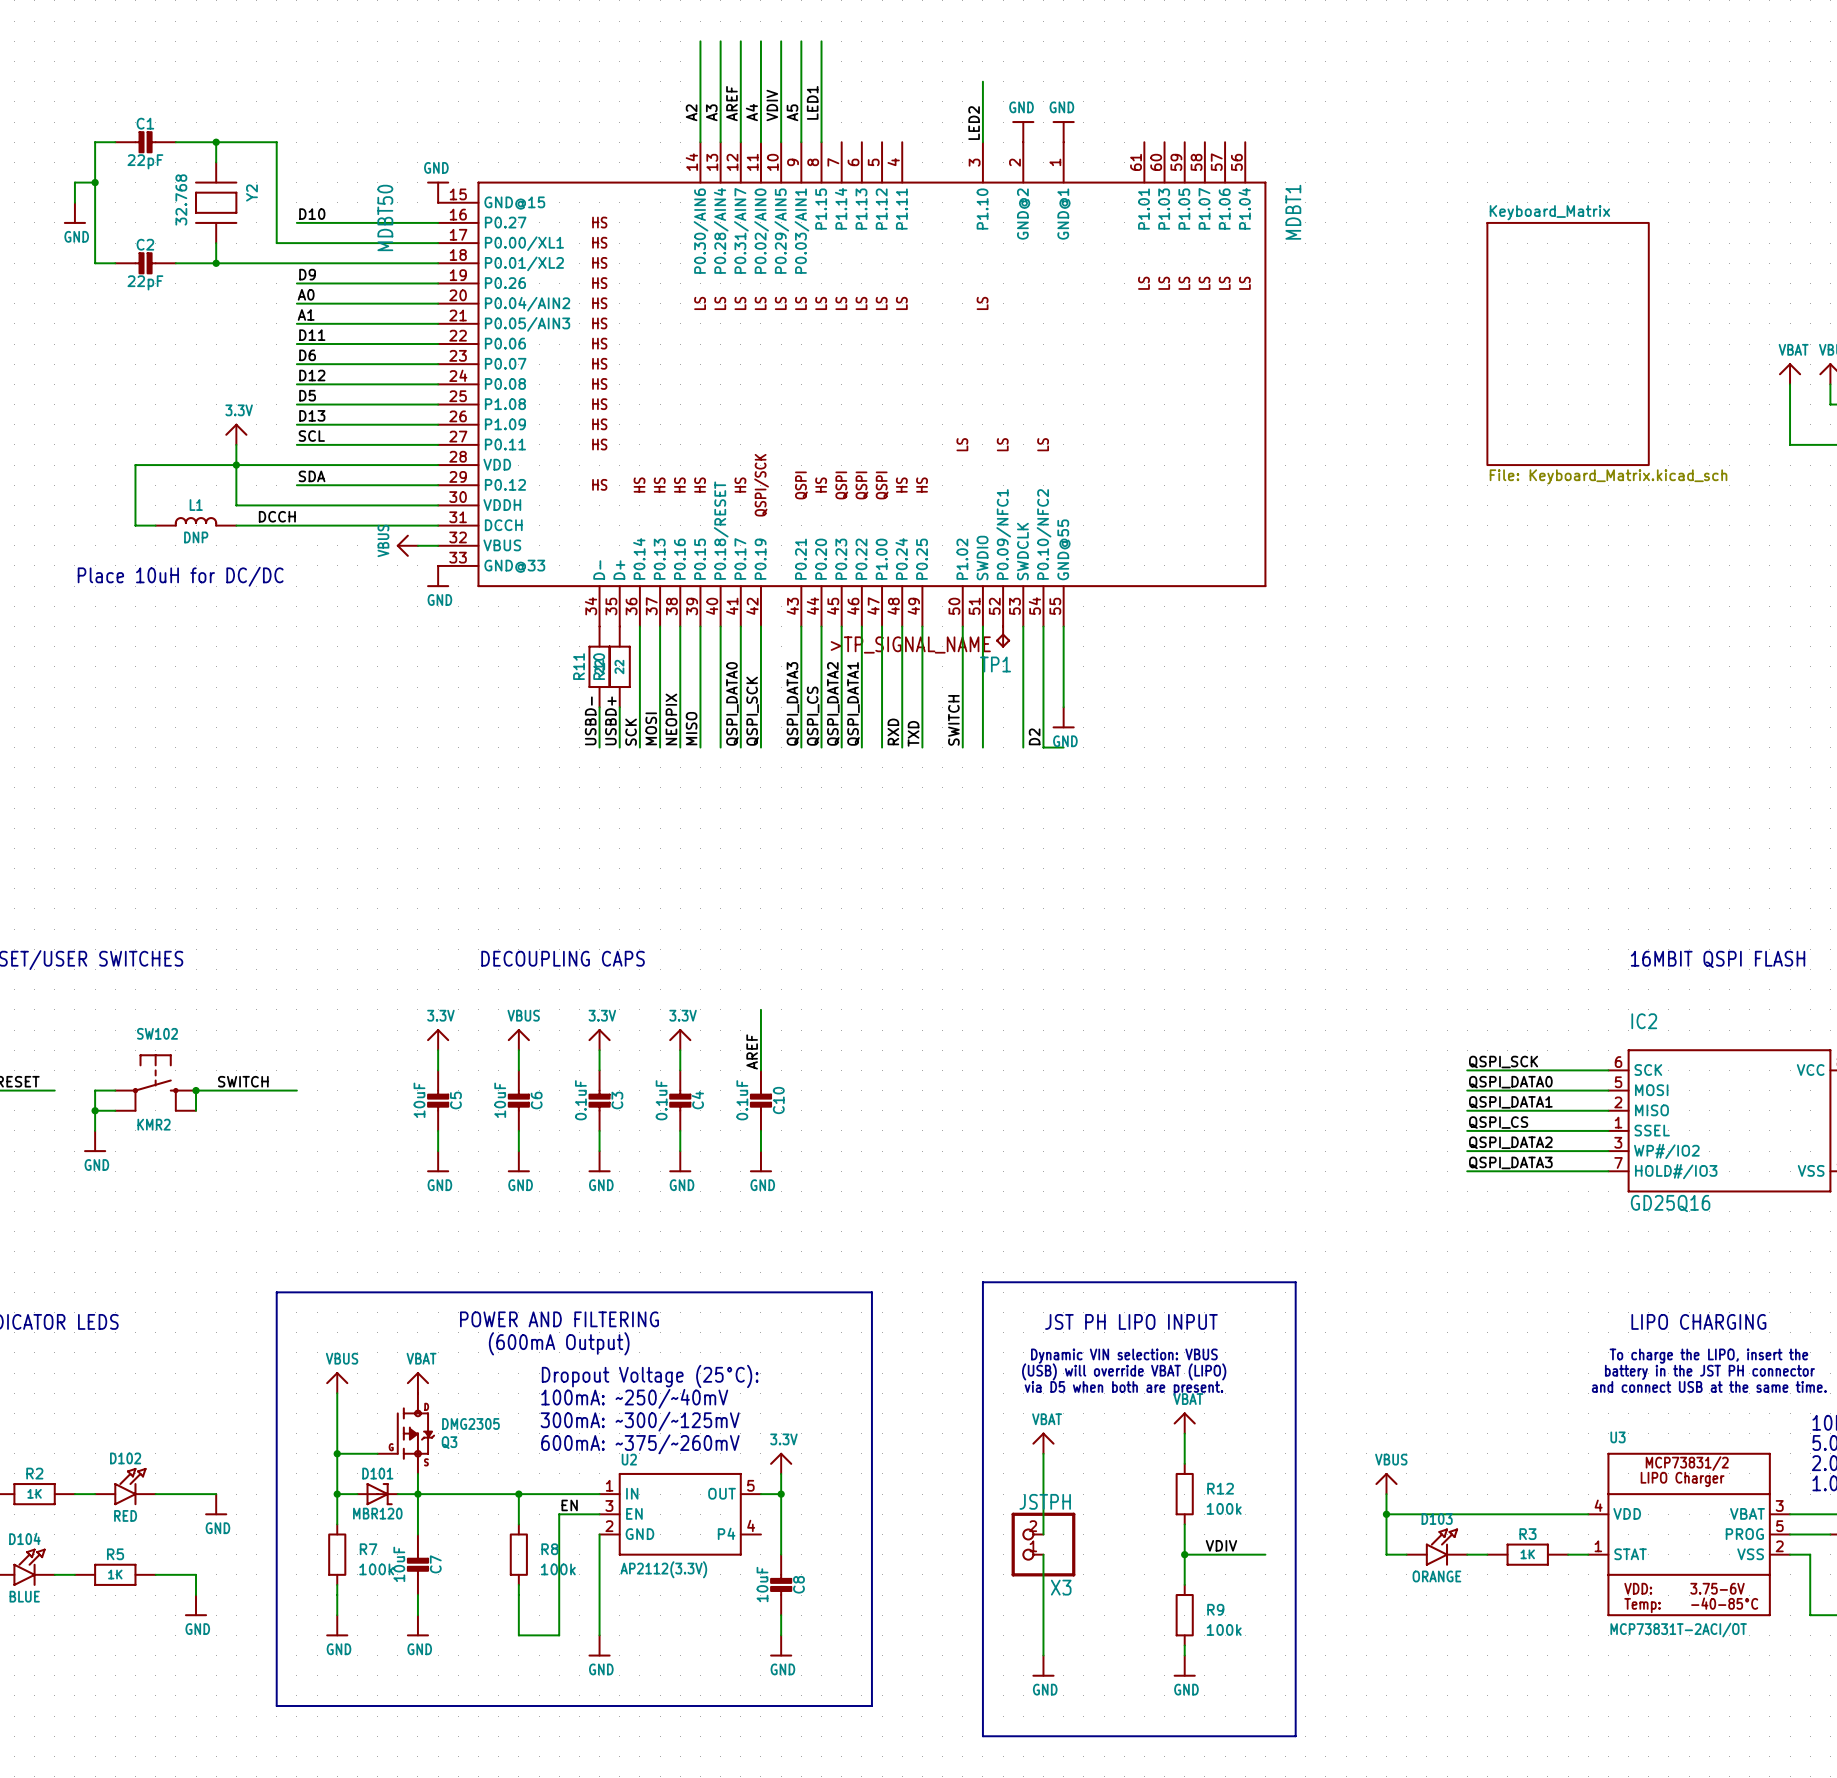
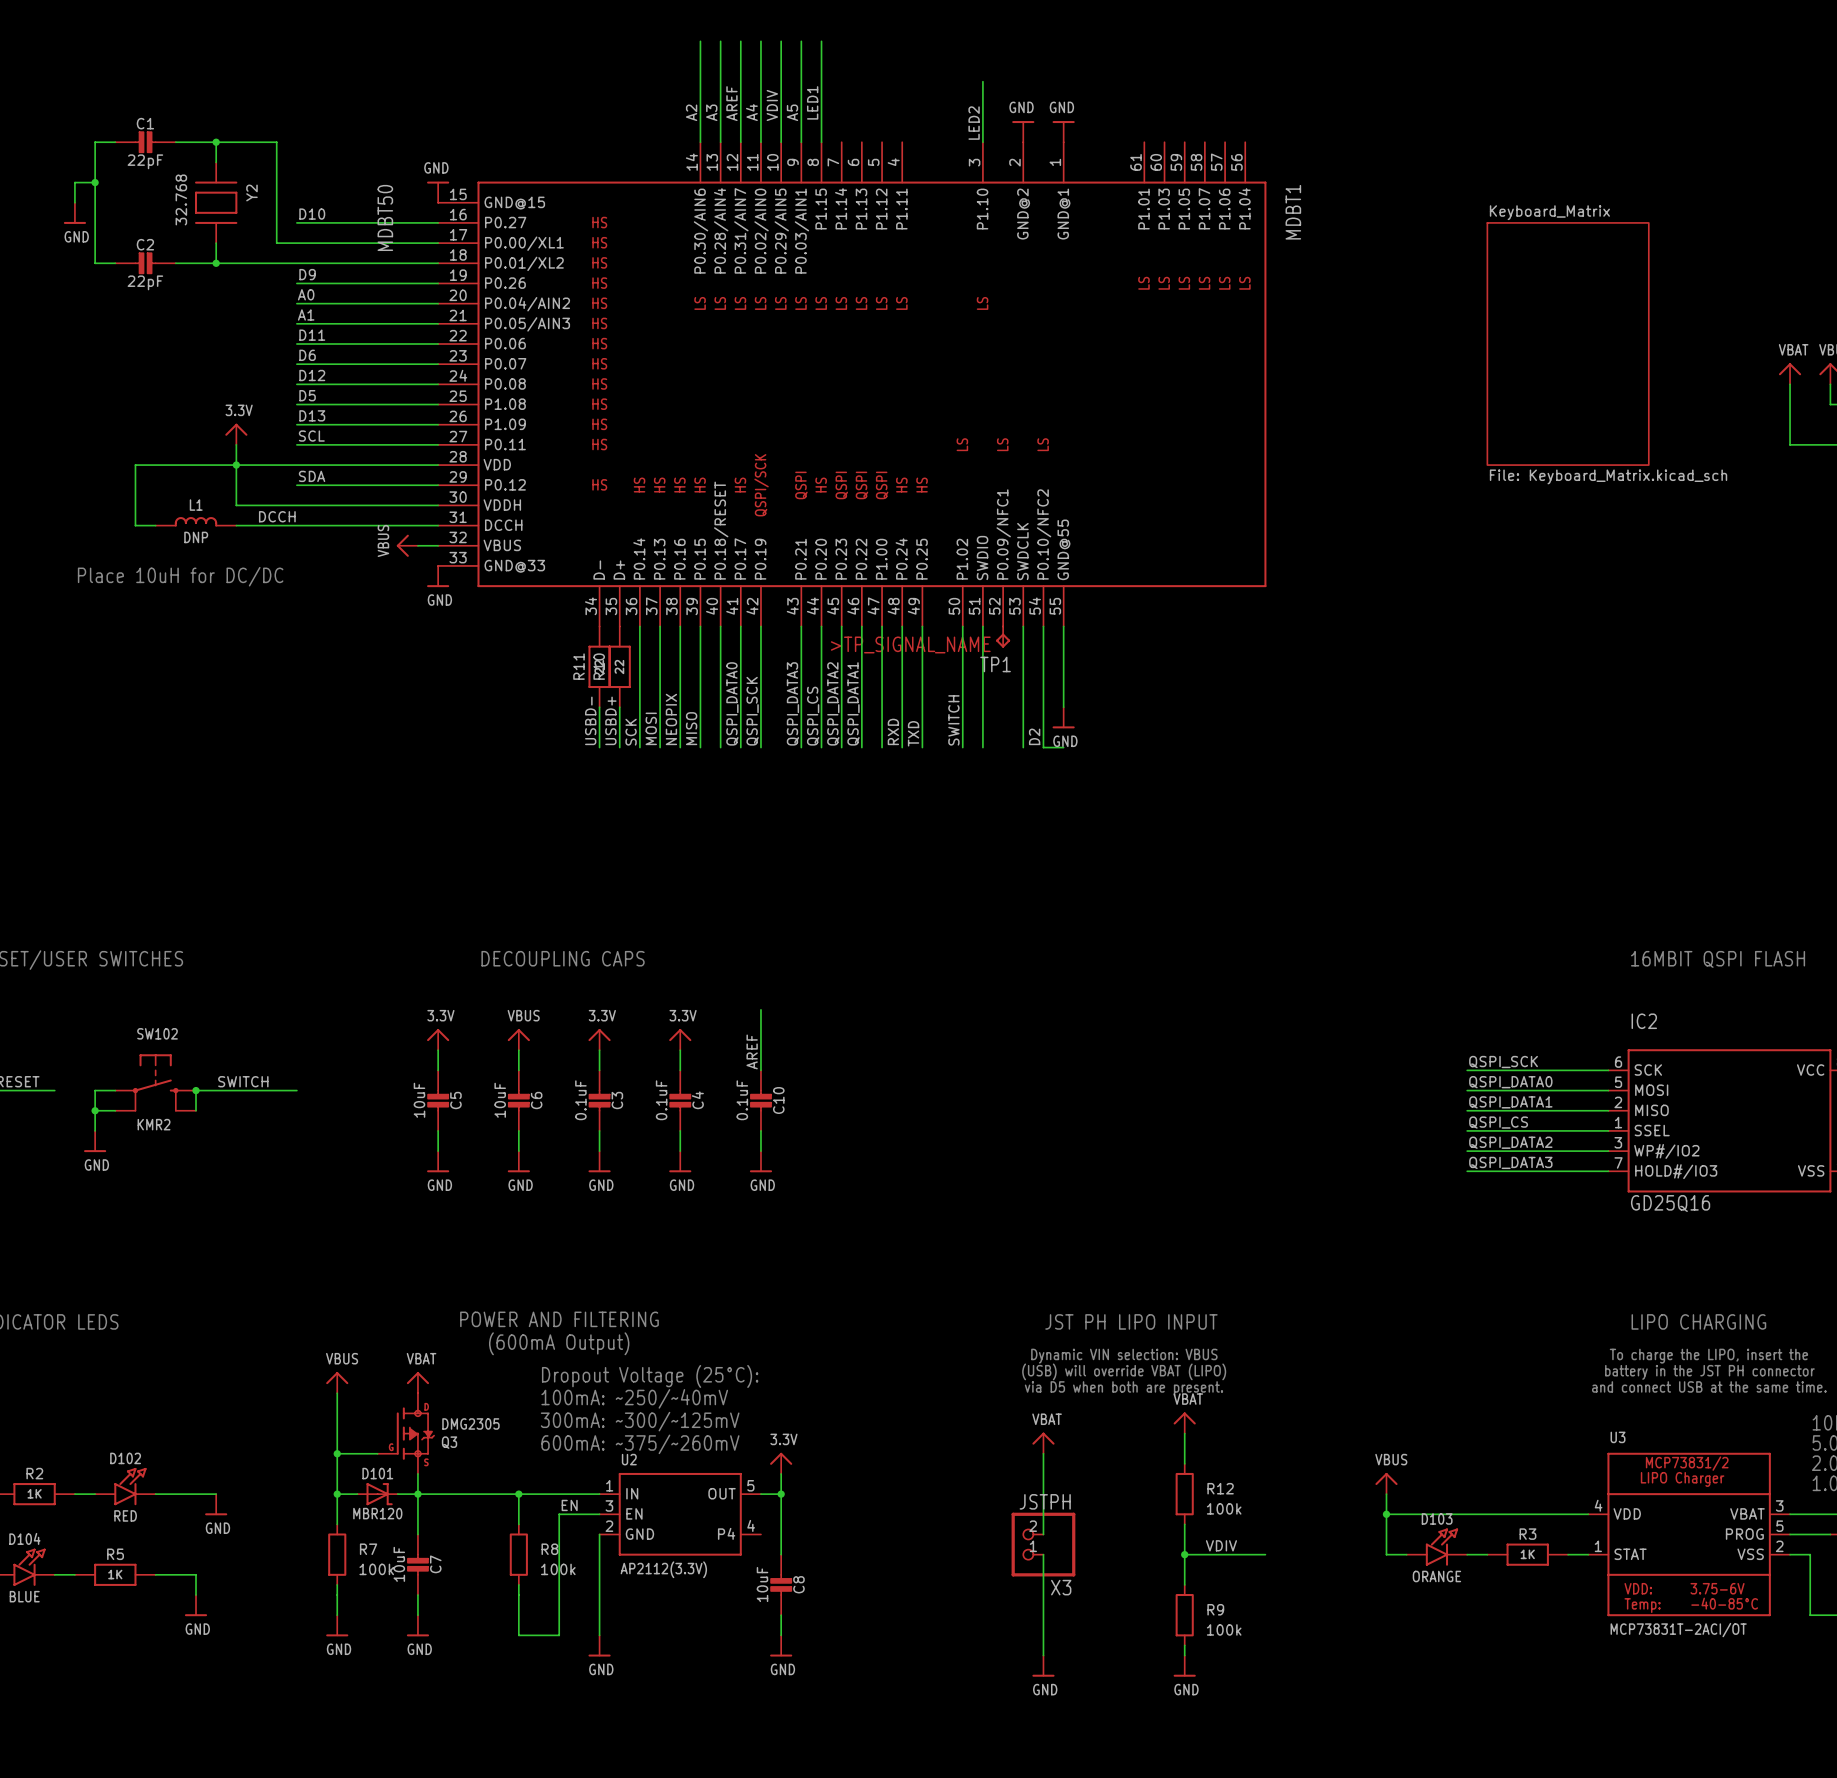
line: (982, 1282) (1295, 1282) (1295, 1736) (982, 1736) (982, 1282) -> none
line: (276, 1292) (871, 1292) (871, 1705) (276, 1705) (276, 1292) -> none

